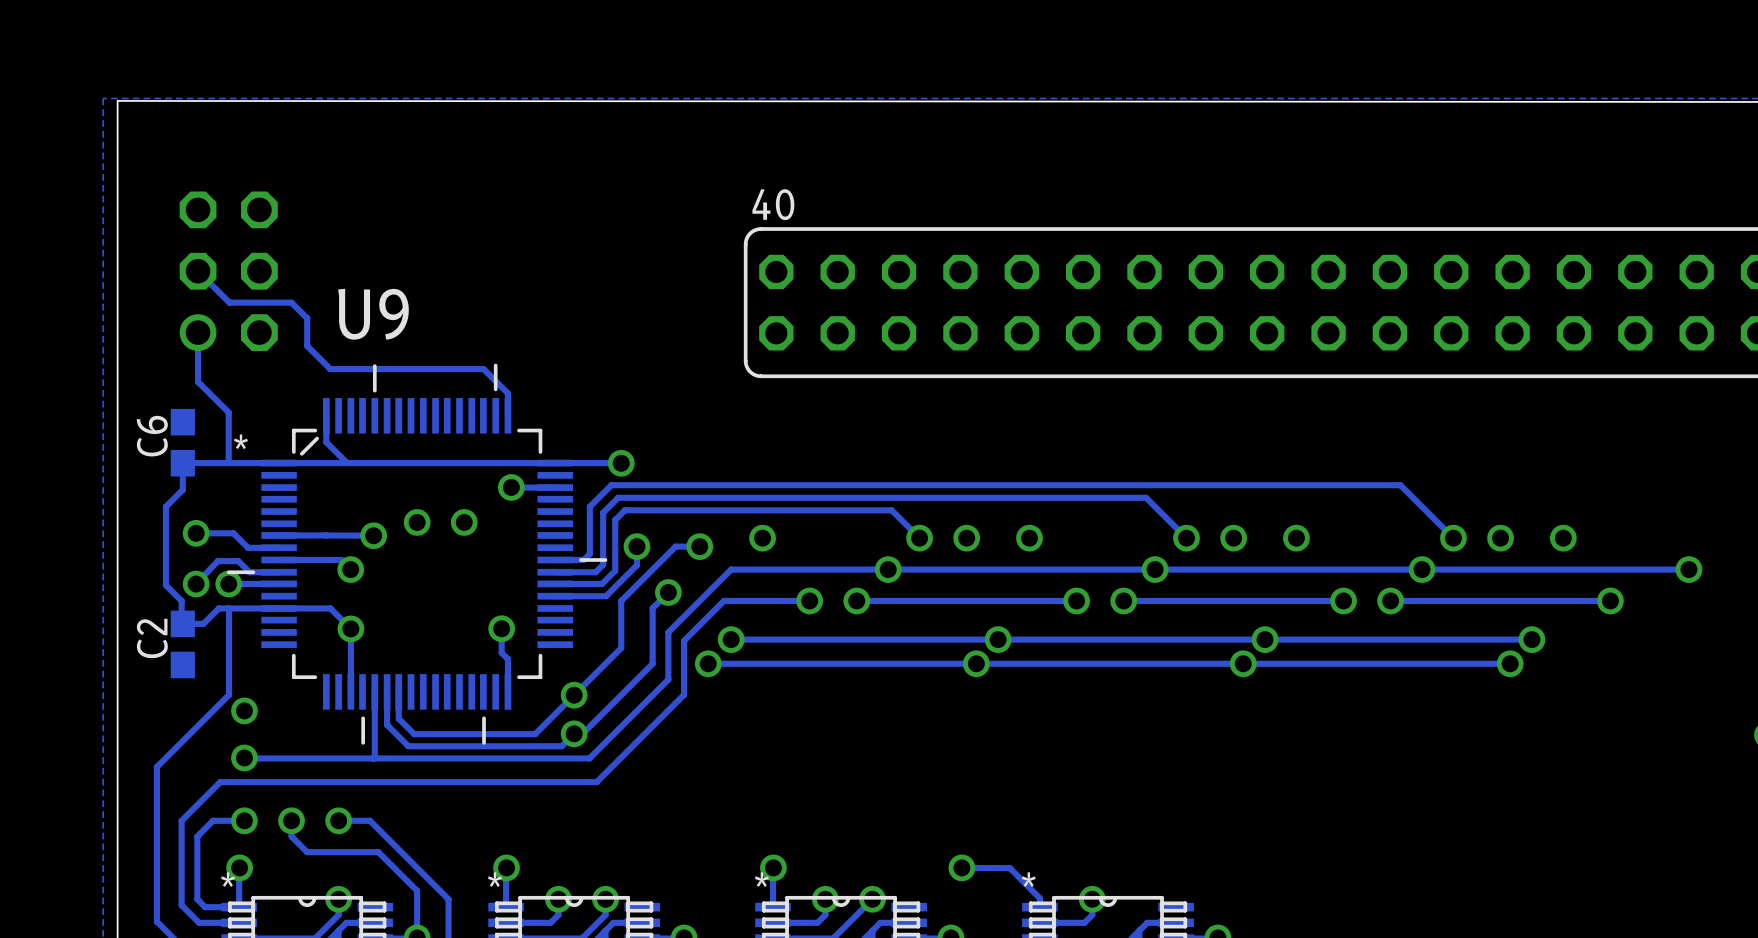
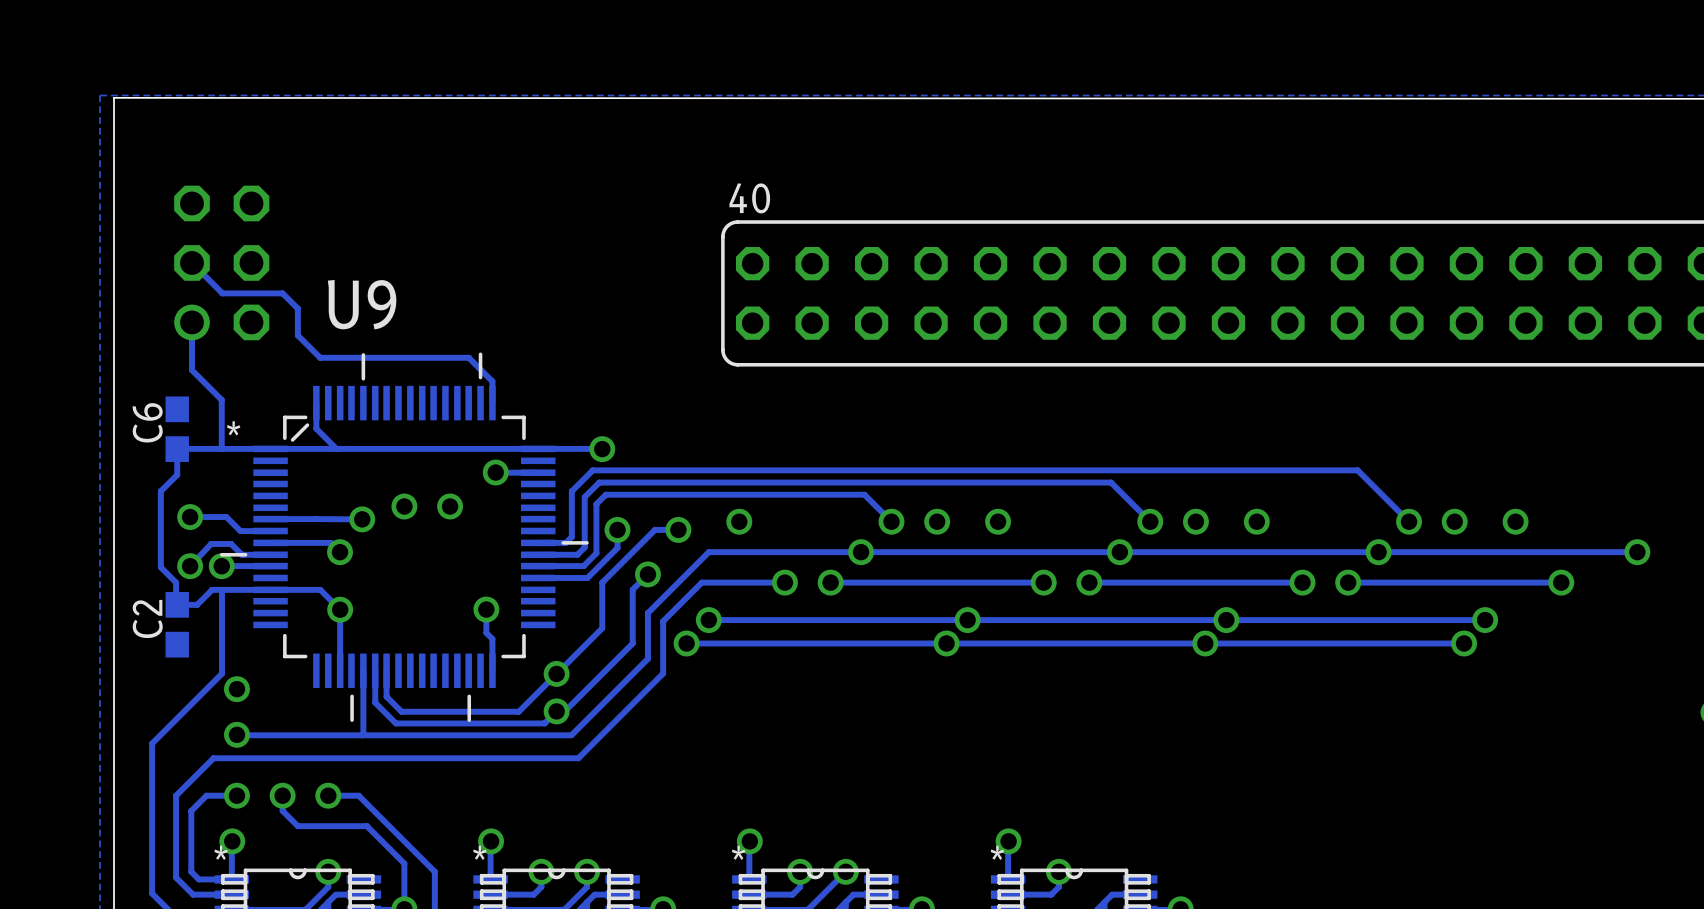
track: (961, 867) (1009, 868) (1039, 898) -> (1008, 841) (1008, 870)
via position: (961, 867) -> (1008, 841)

